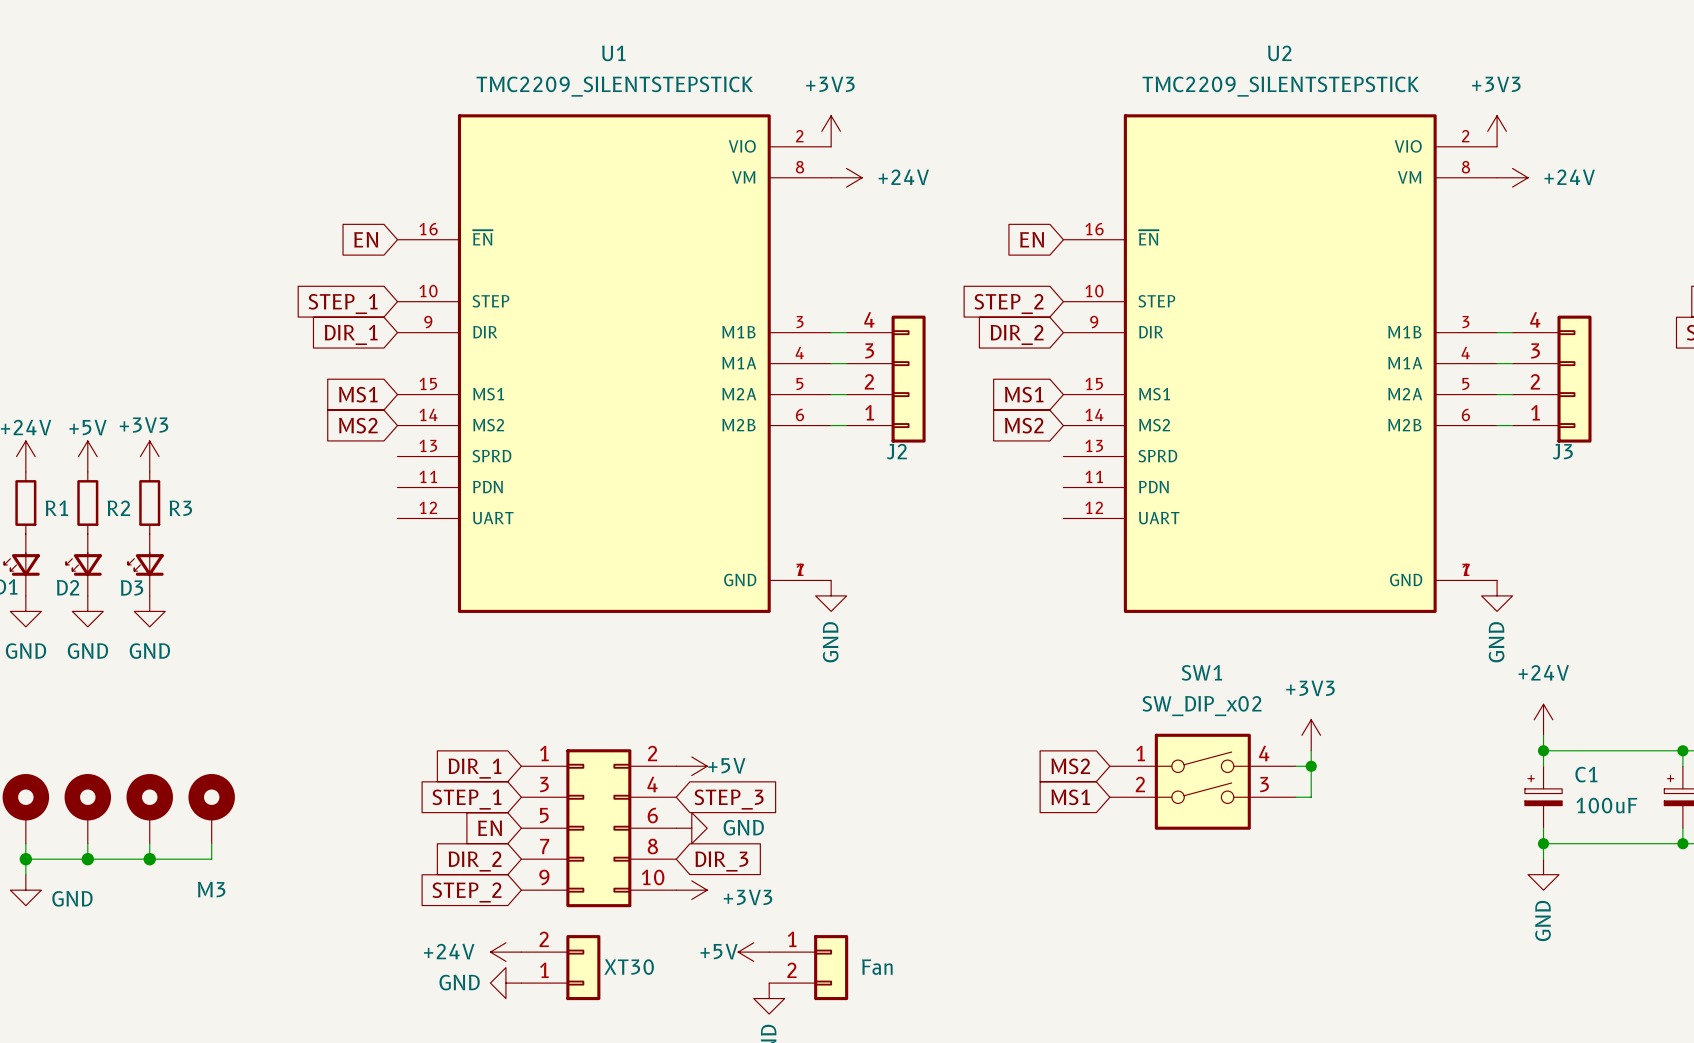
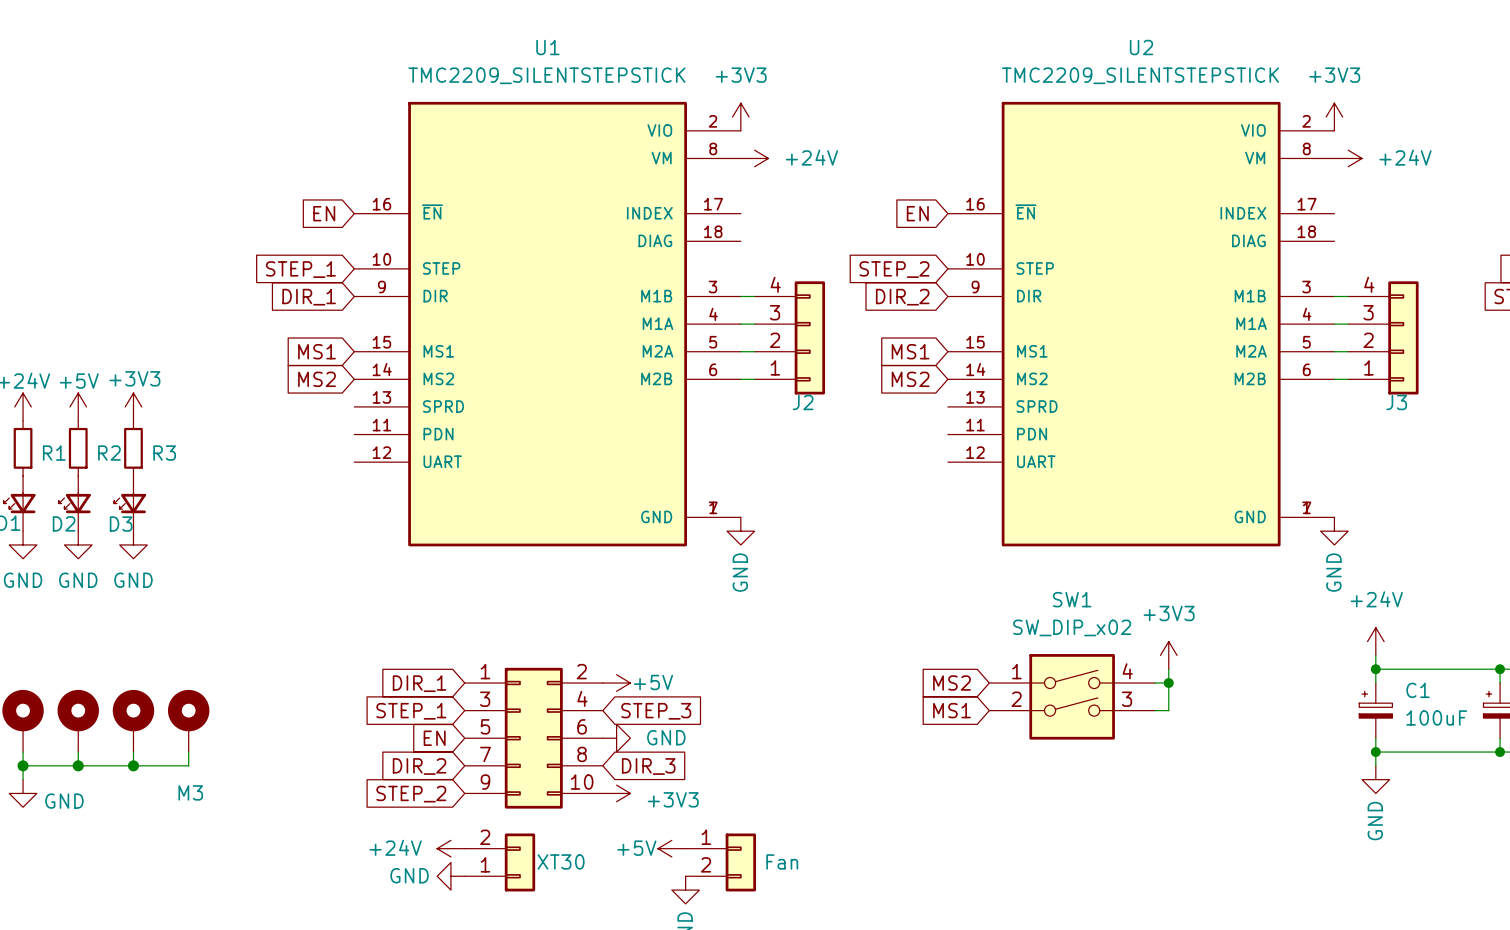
U1 symbol: [397, 114, 832, 613] -> [354, 101, 741, 547]
U2 symbol: [1063, 114, 1498, 613] -> [947, 101, 1335, 547]

